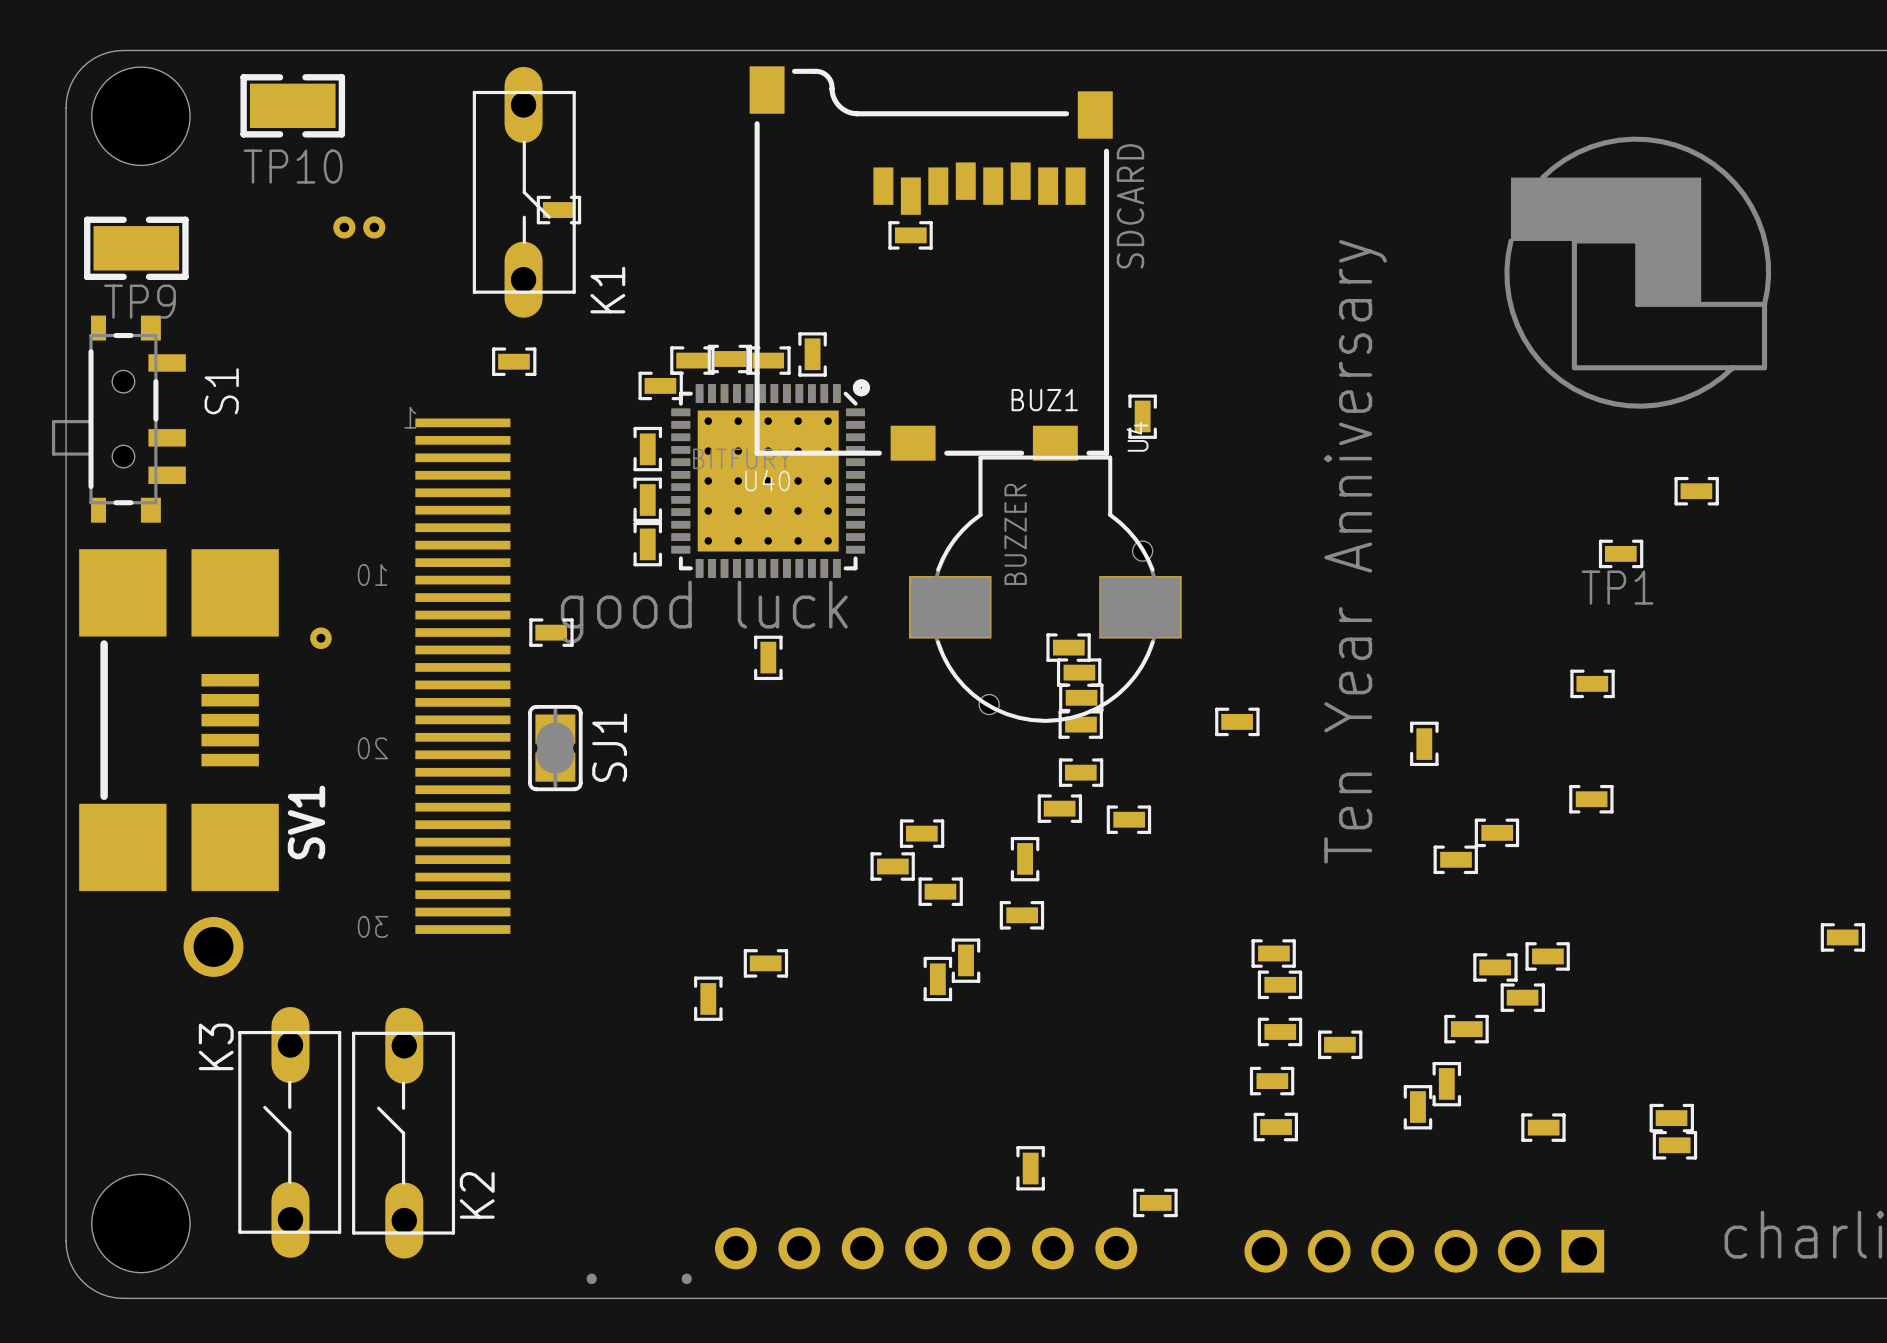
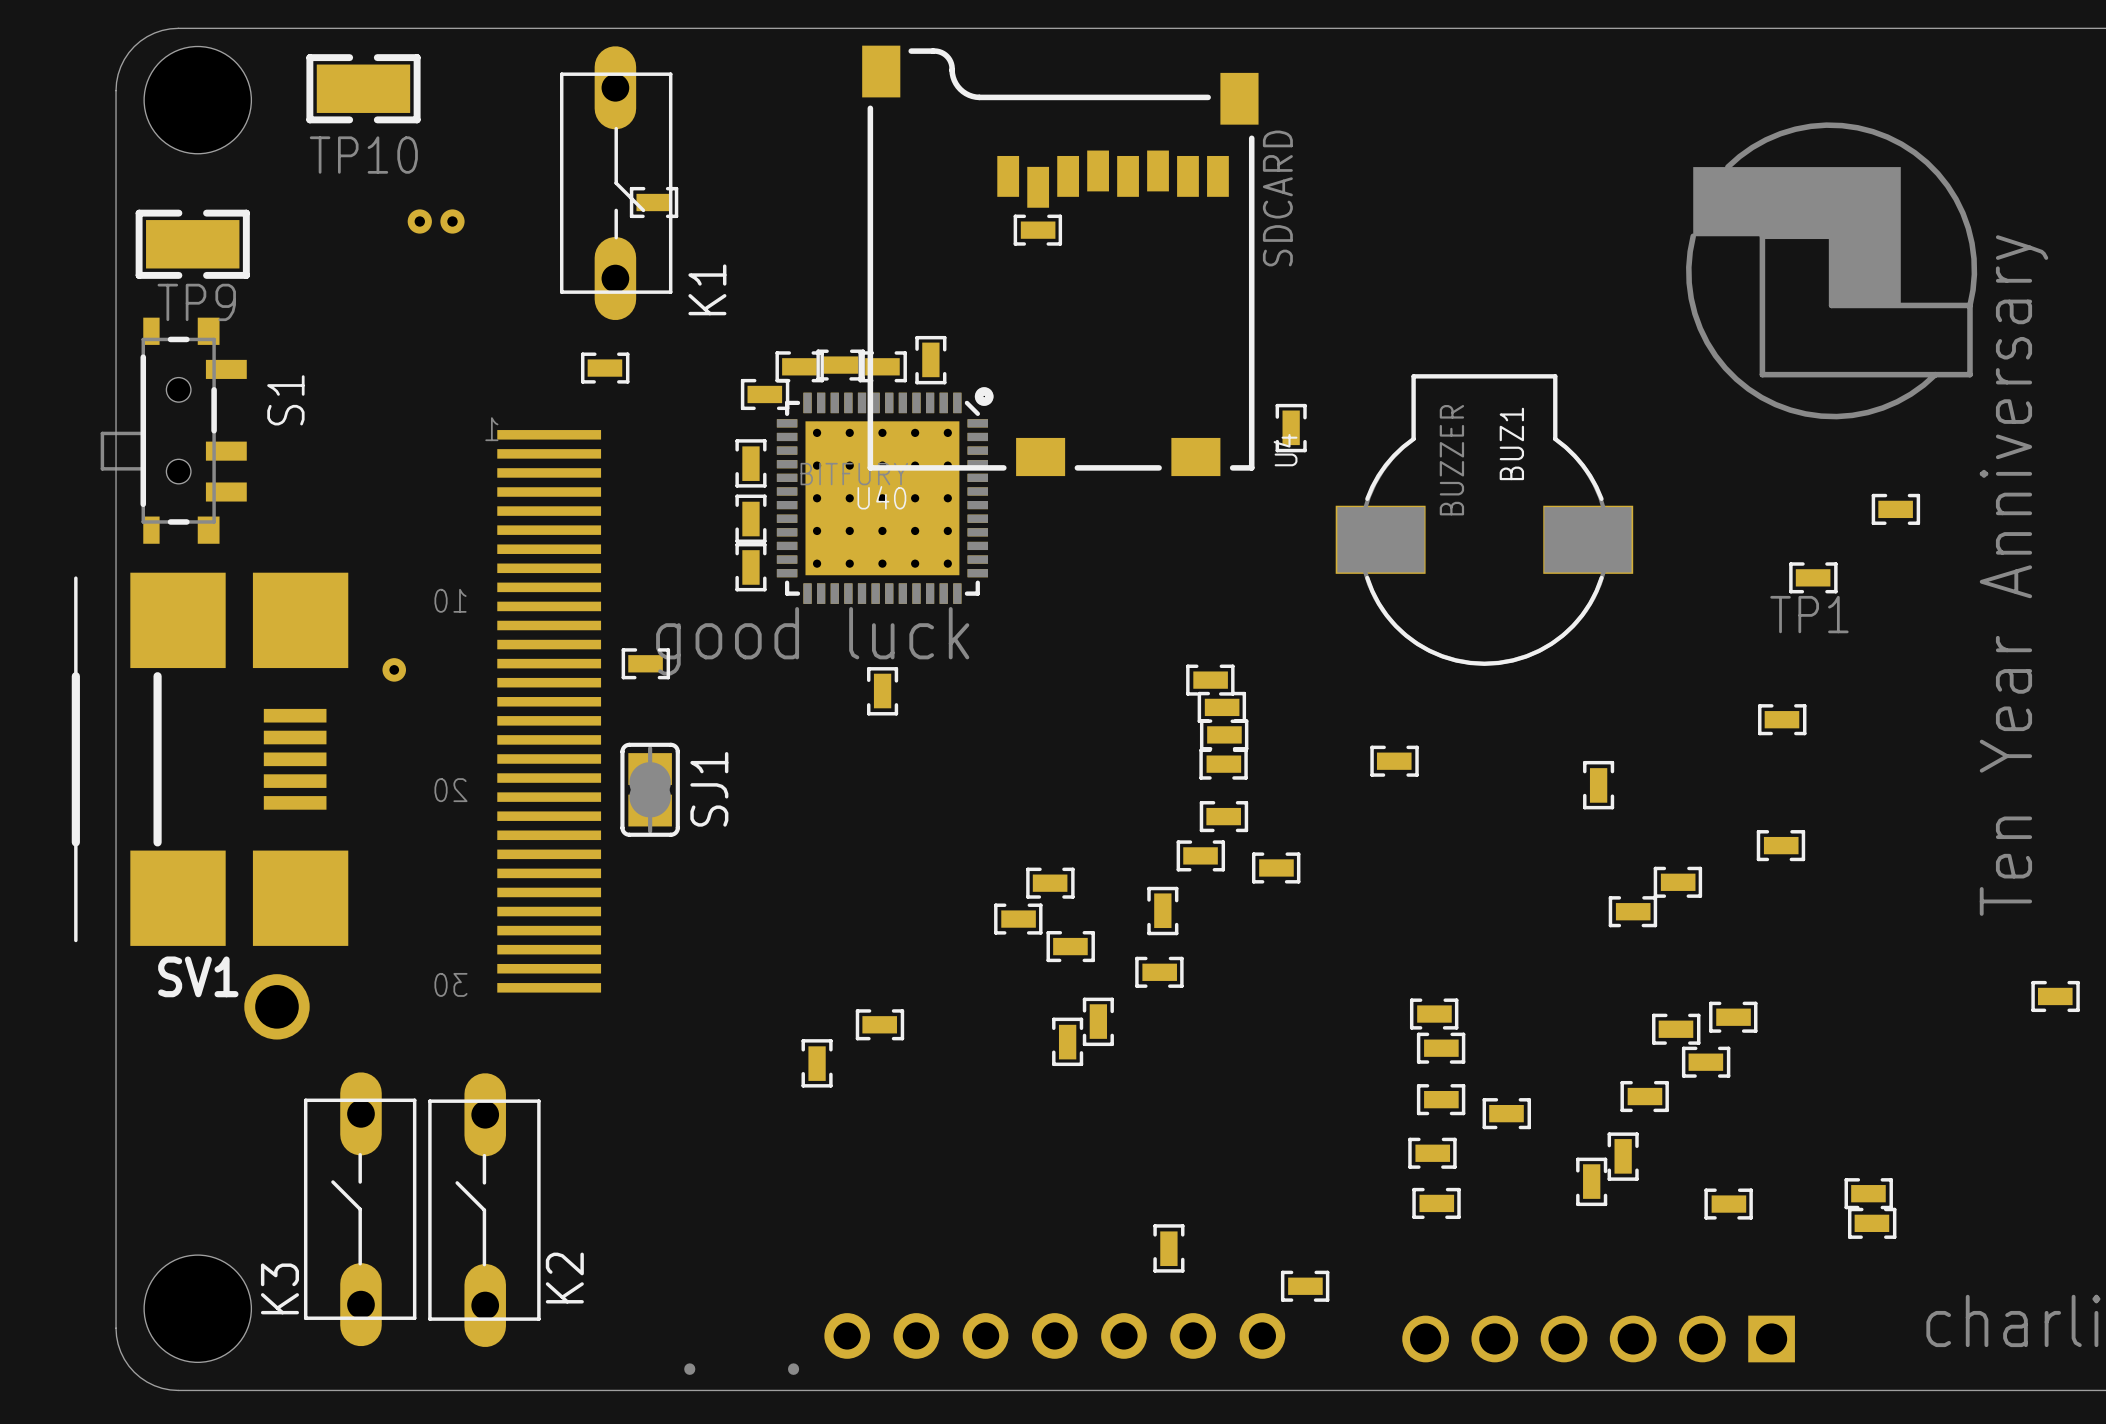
BUZ1 name position: BUZ1 (1044, 400) -> BUZ1 (1511, 443)
BUZ1 footprint: [909, 455, 1182, 723] -> [1335, 374, 1634, 666]
SV1 footprint: [79, 549, 279, 892] -> [71, 572, 349, 946]
text position: Ten Year Anniversary (1355, 551) -> Ten Year Anniversary (2014, 575)
SV1 name position: SV1 (306, 822) -> SV1 (198, 976)
K3 name position: K3 (216, 1046) -> K3 (279, 1288)

